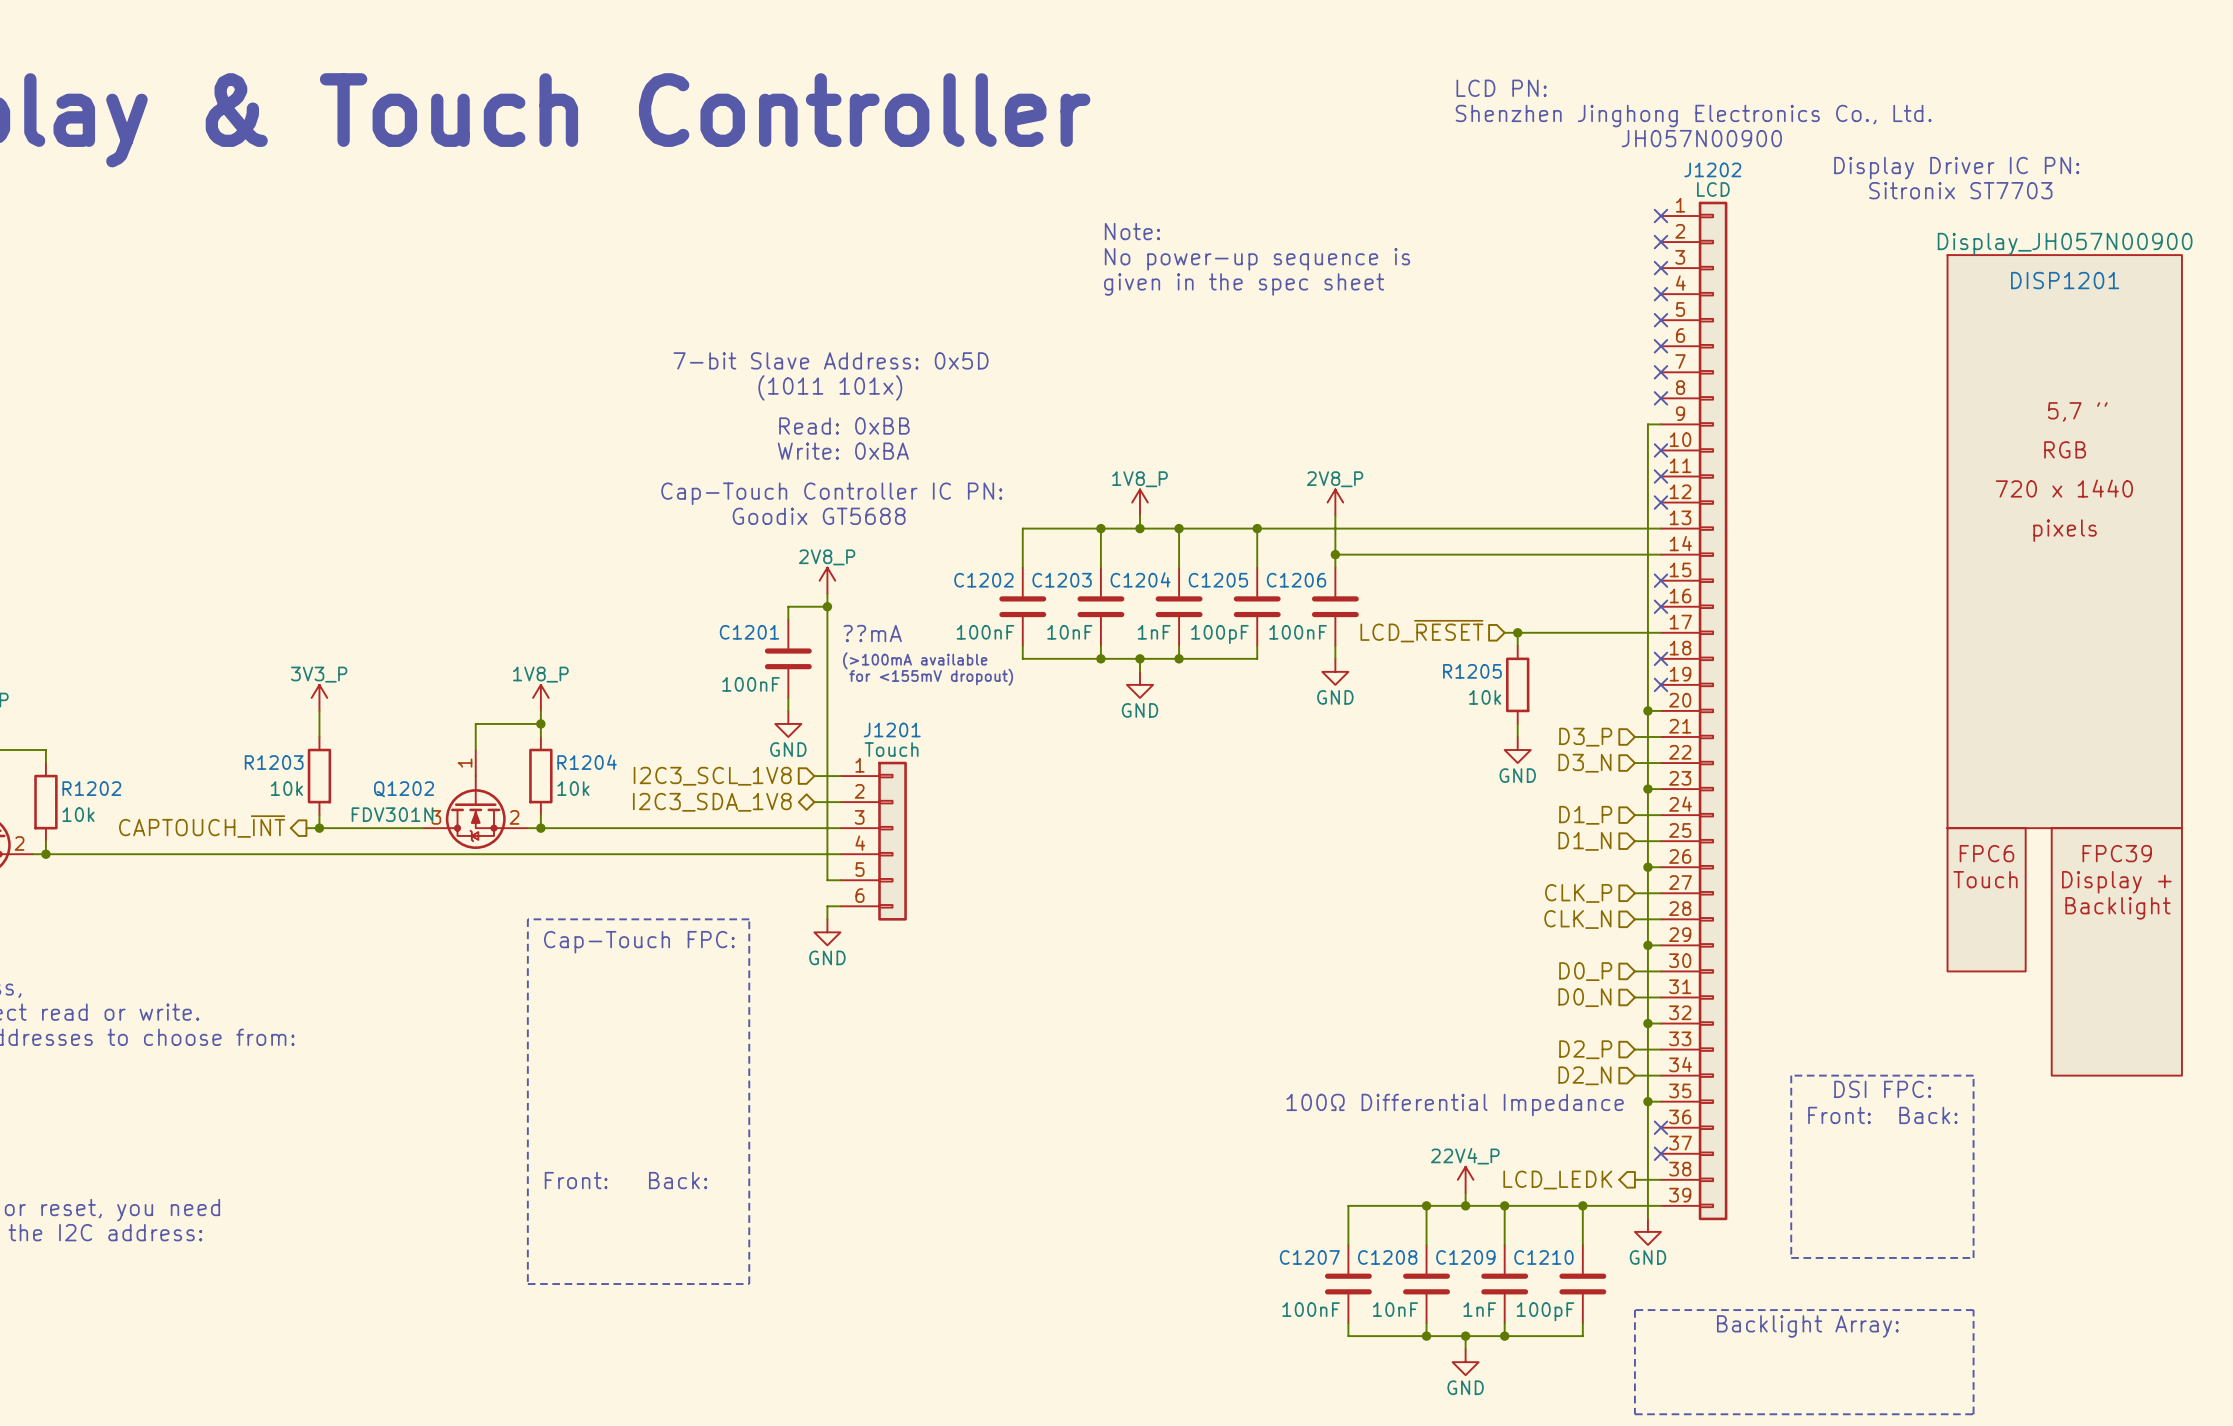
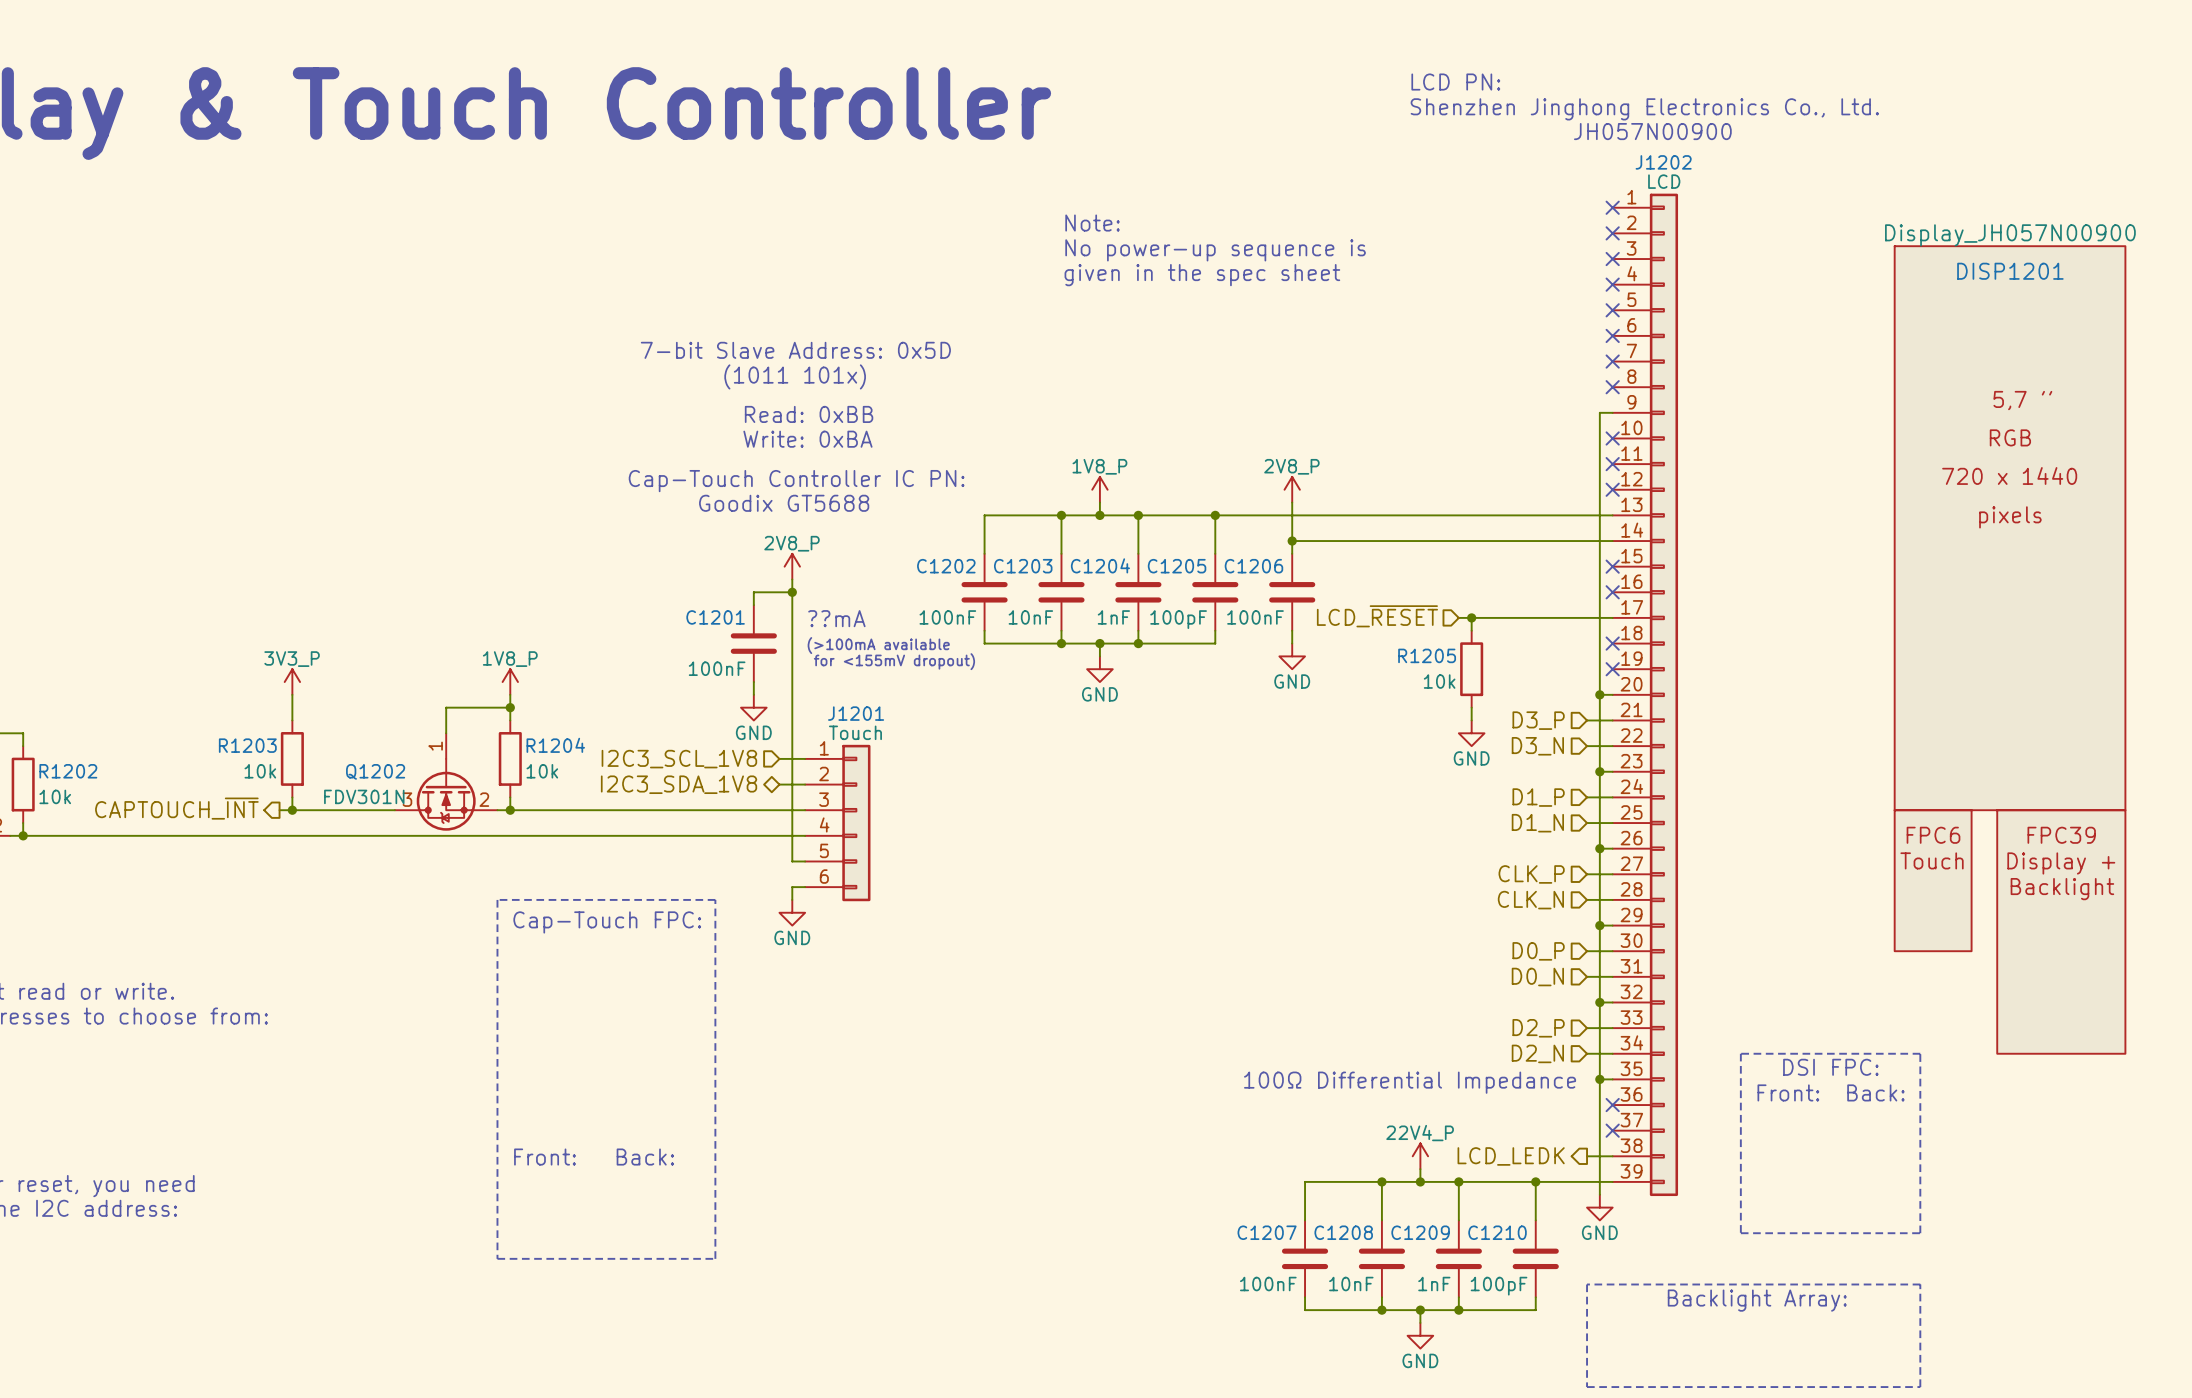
text: Display Driver IC PN: (1956, 168) -> none
text: Sitronix ST7703 (1960, 190) -> none

